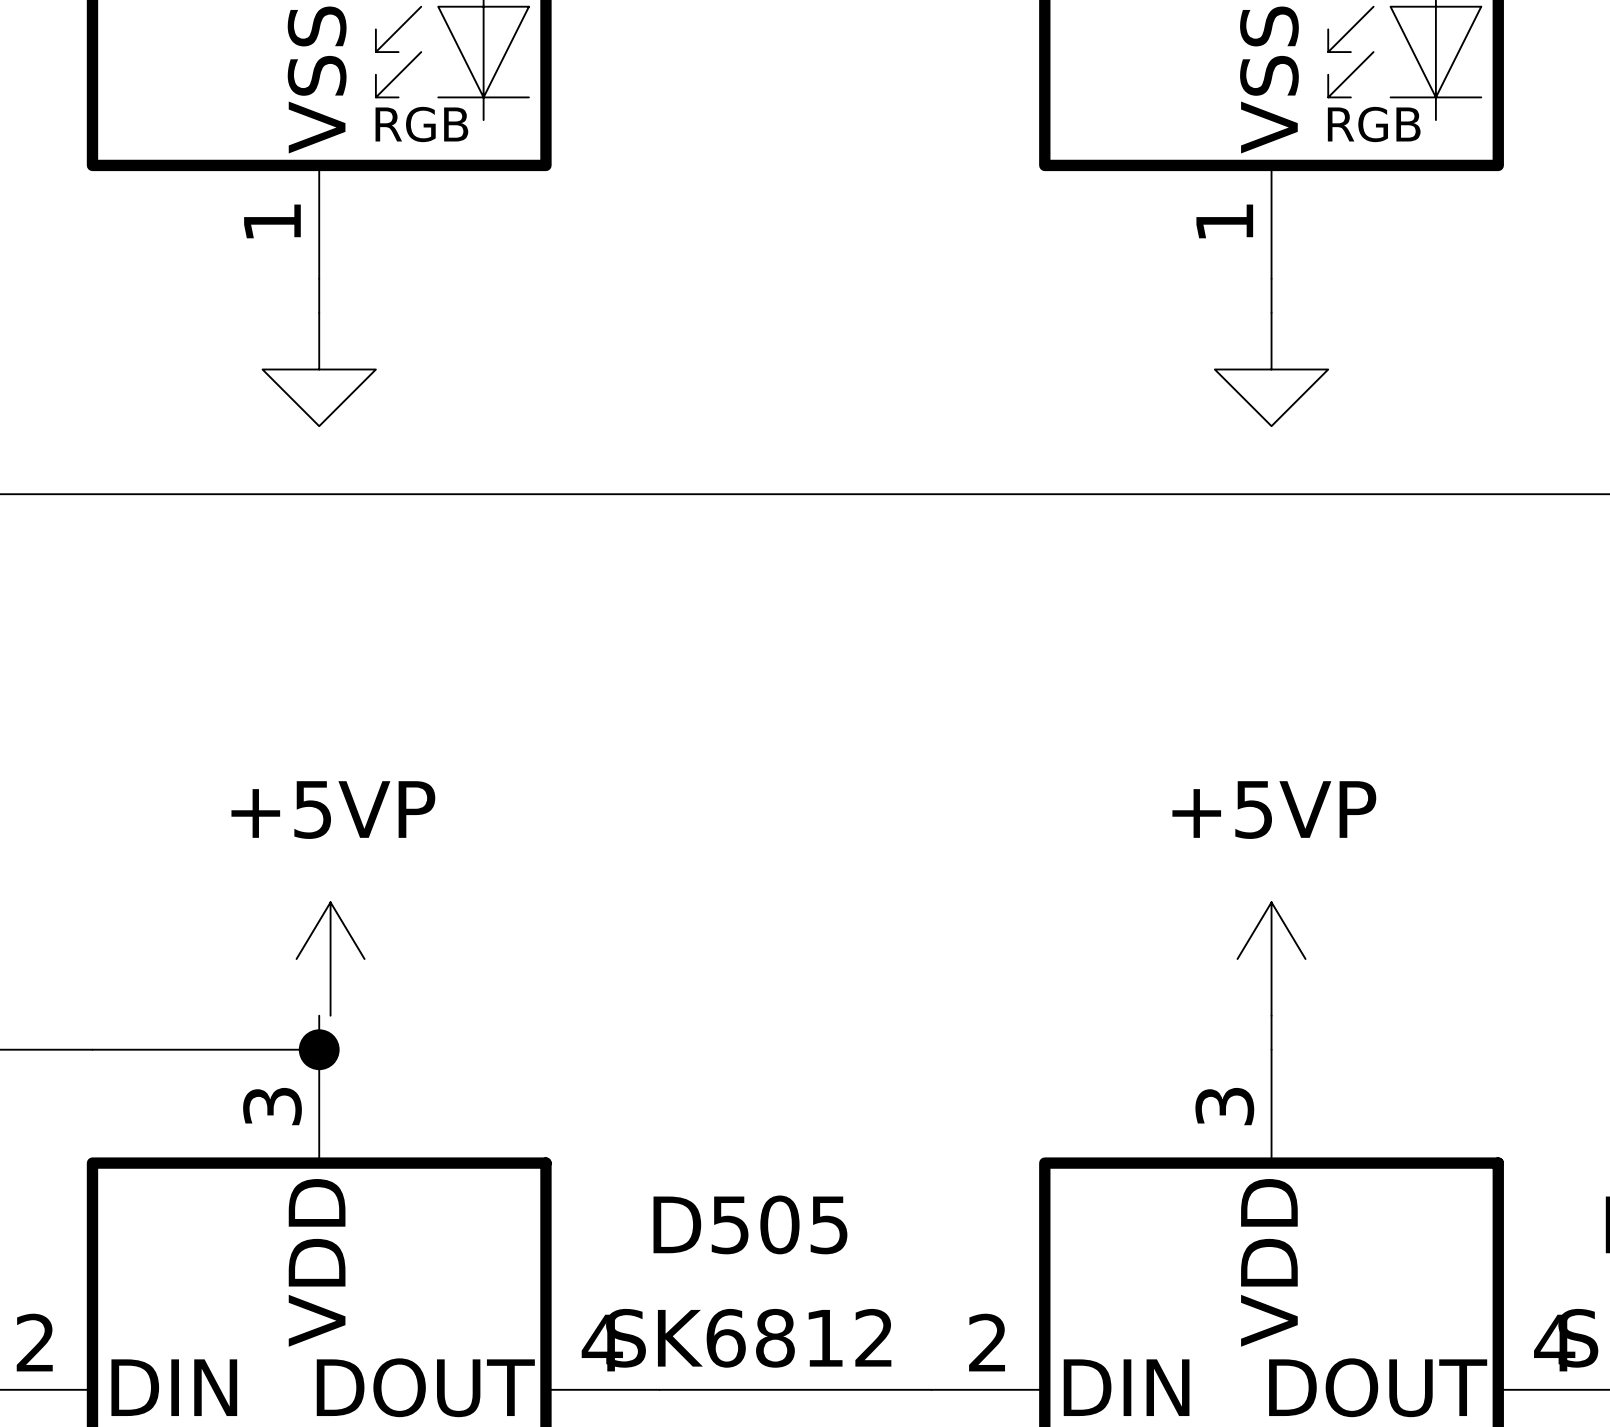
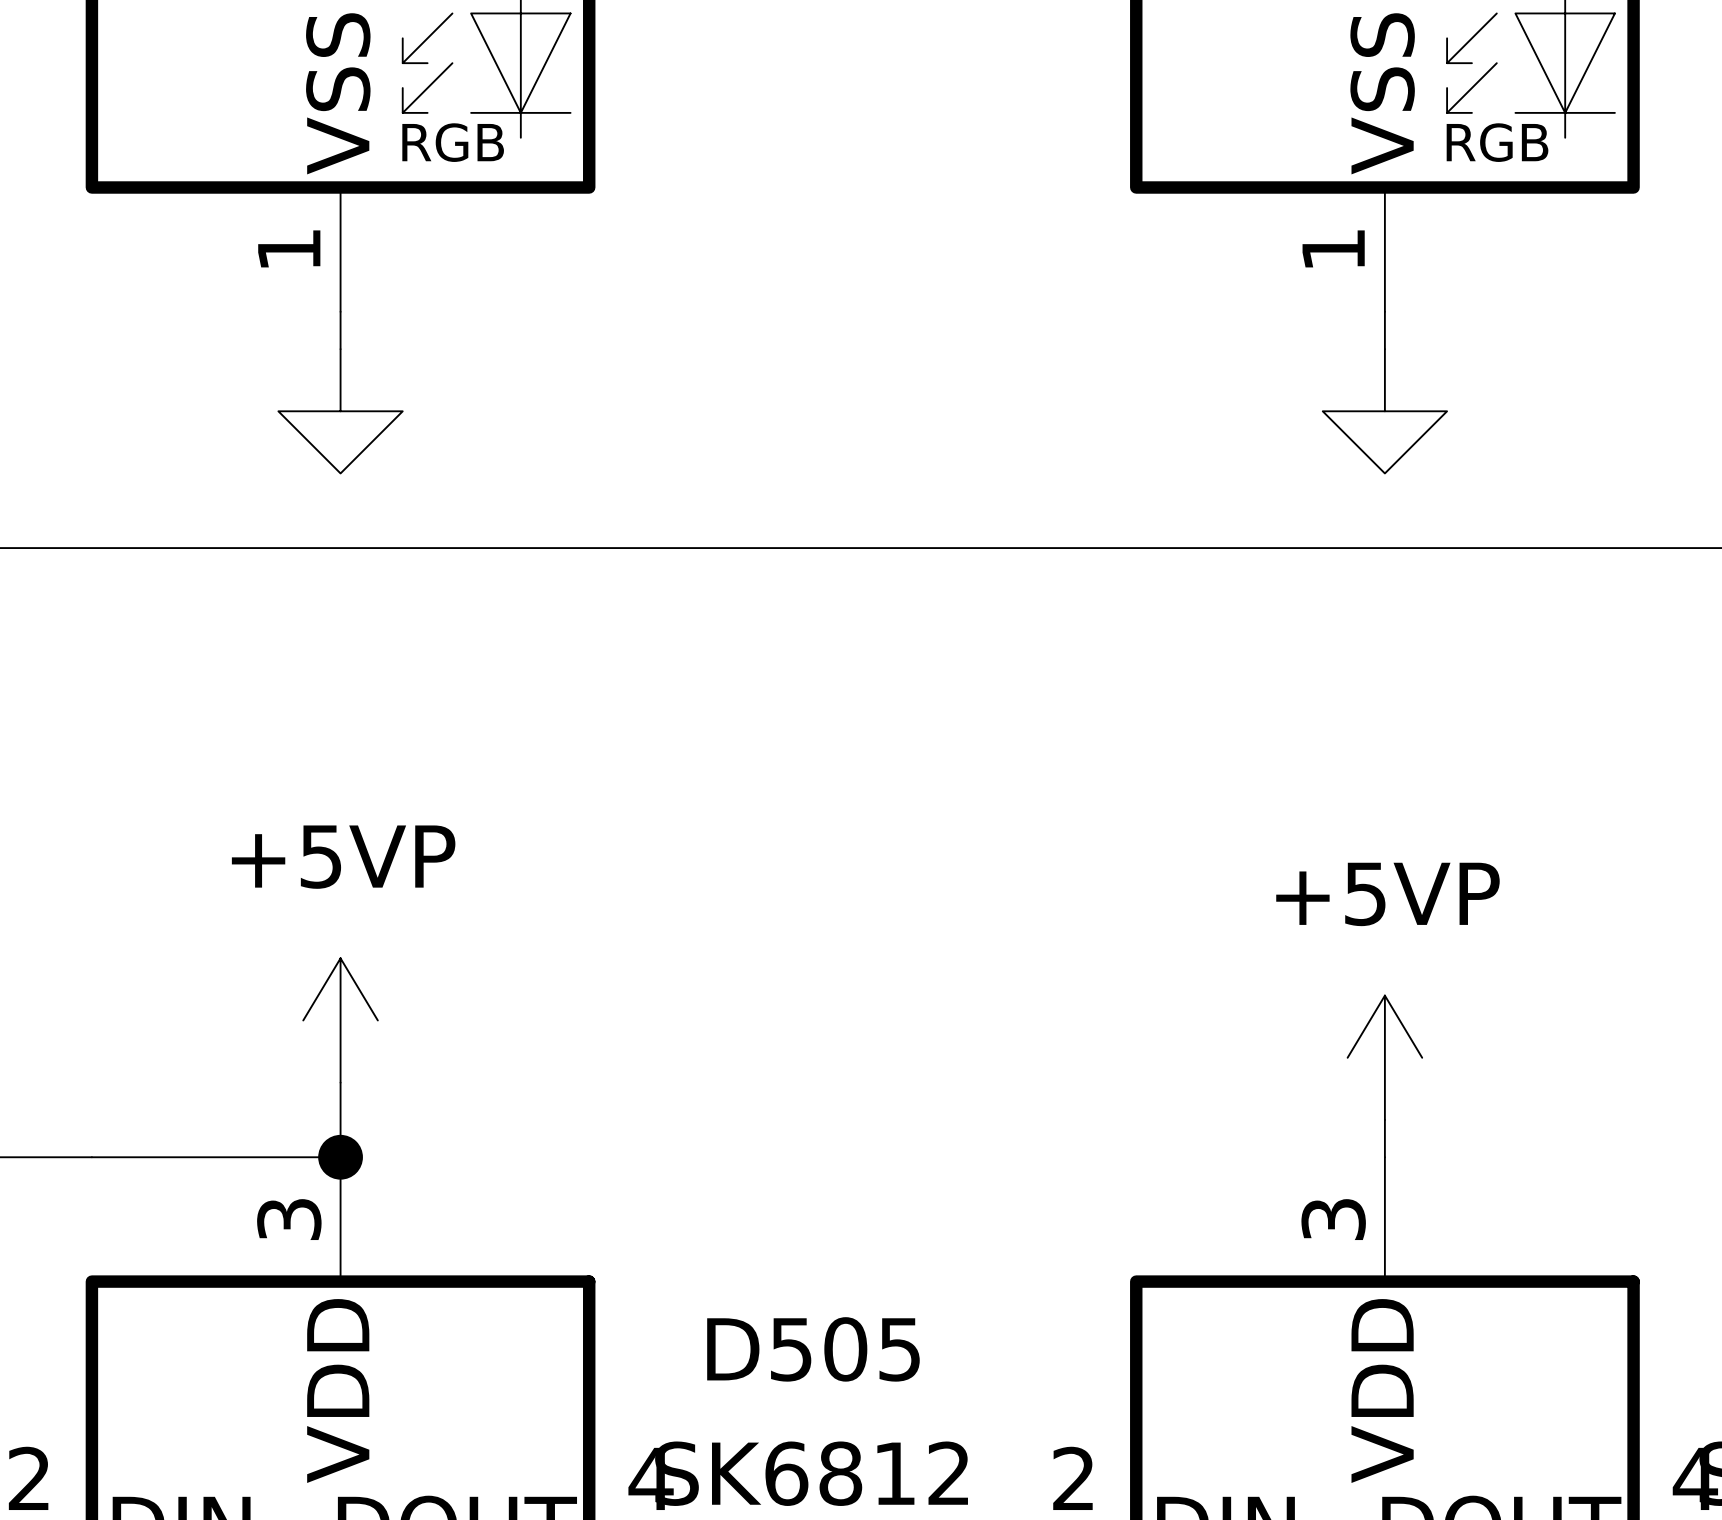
power symbol position: +5VP (330, 959) -> +5VP (340, 1020)
wire: none -> (340, 1082) (340, 1119)

